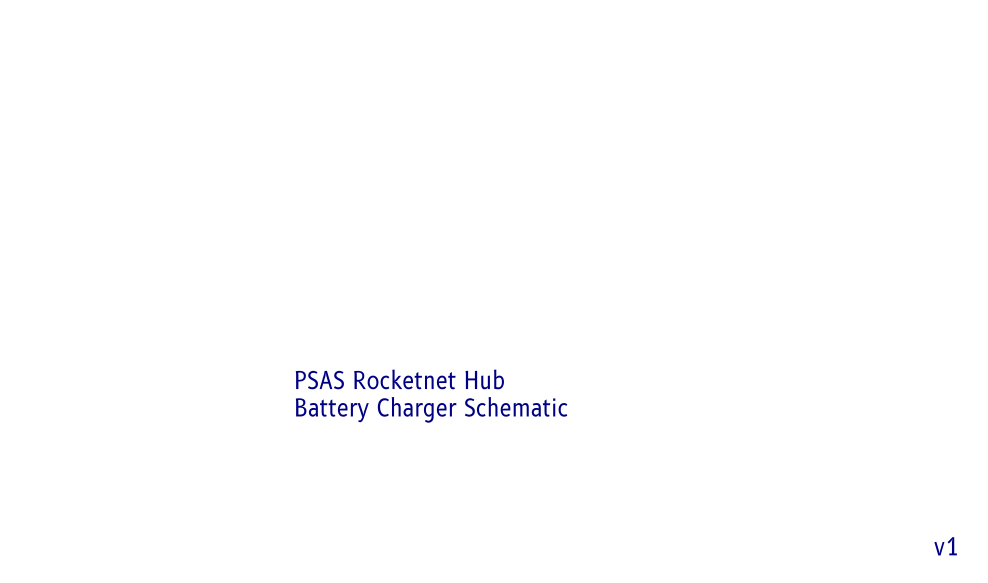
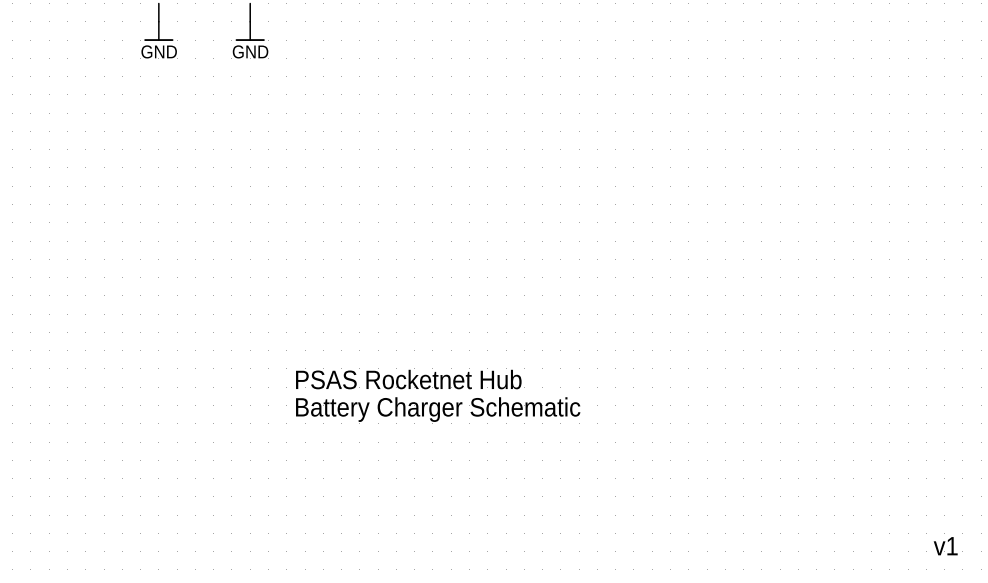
wire: none -> (158, 3) (158, 21)
wire: none -> (250, 3) (250, 21)
power symbol: none -> GND (158, 31)
power symbol: none -> GND (250, 31)

